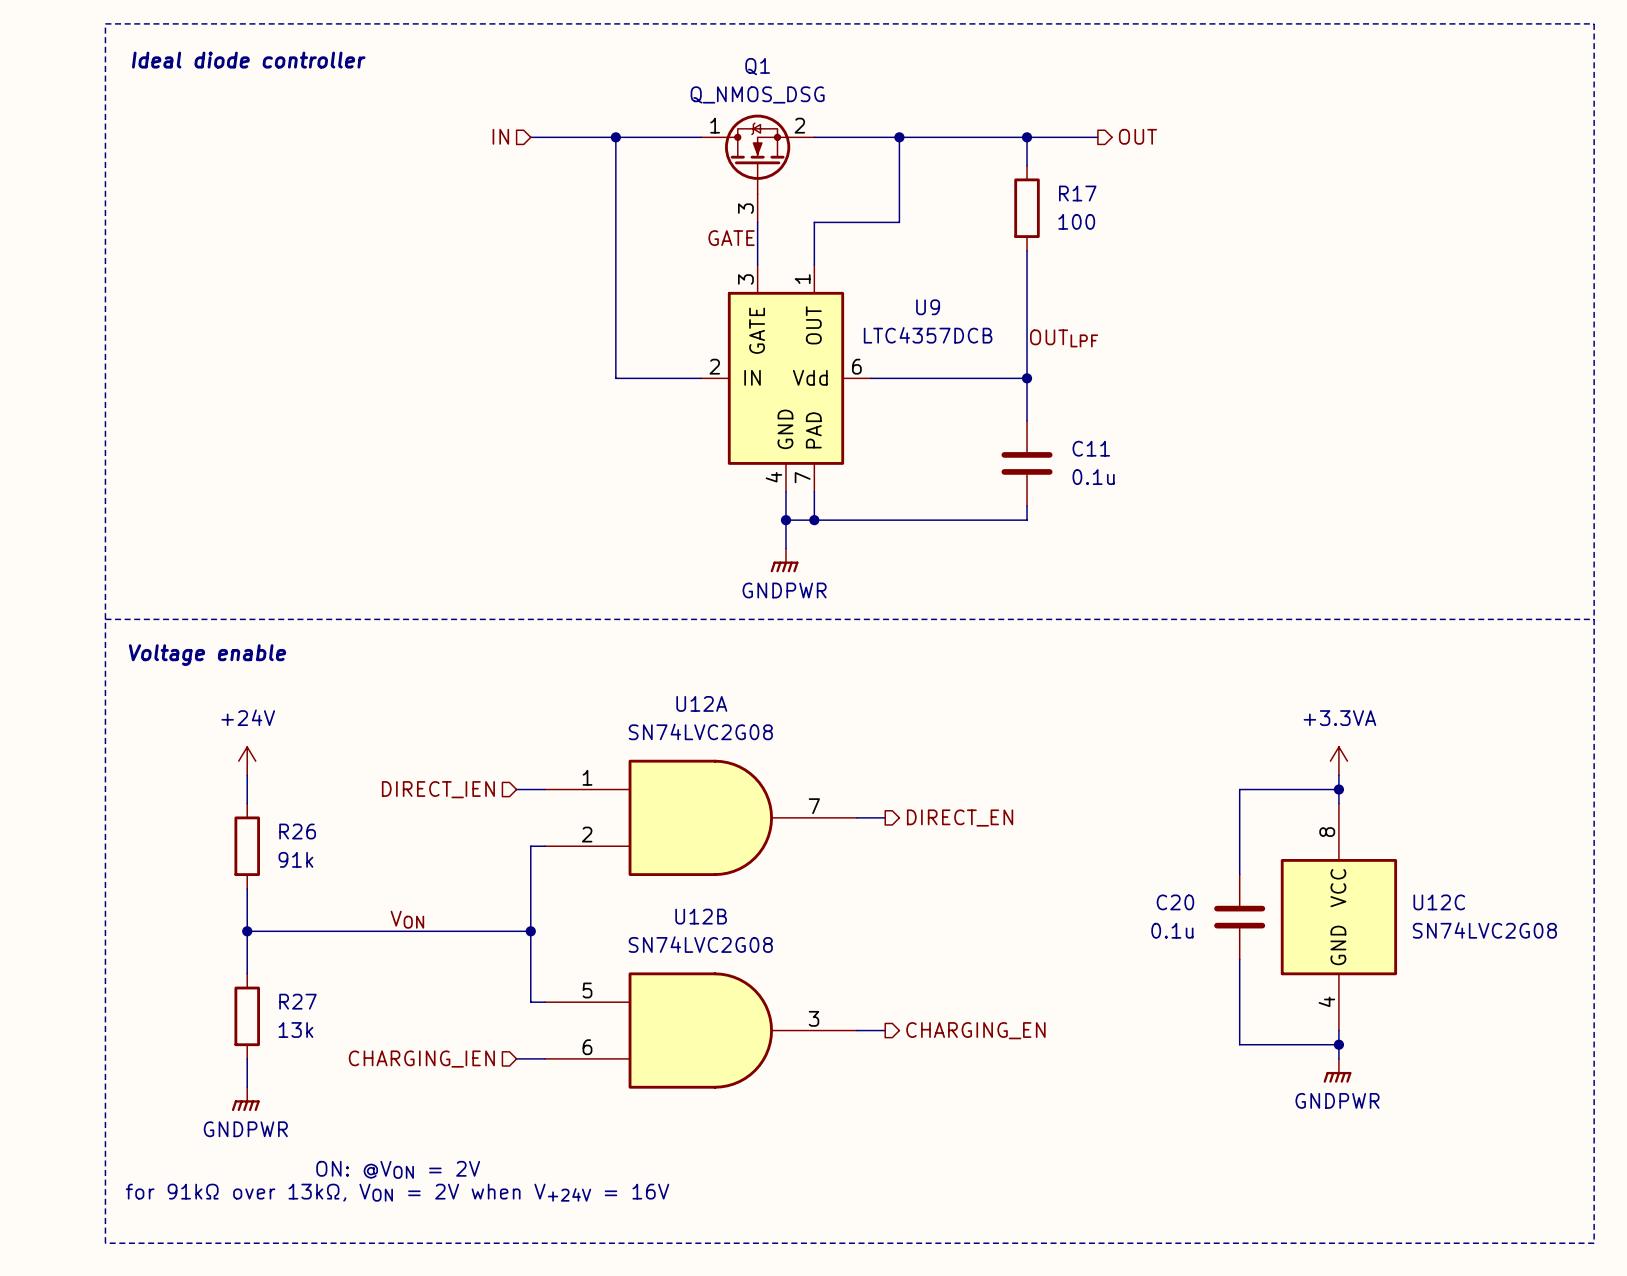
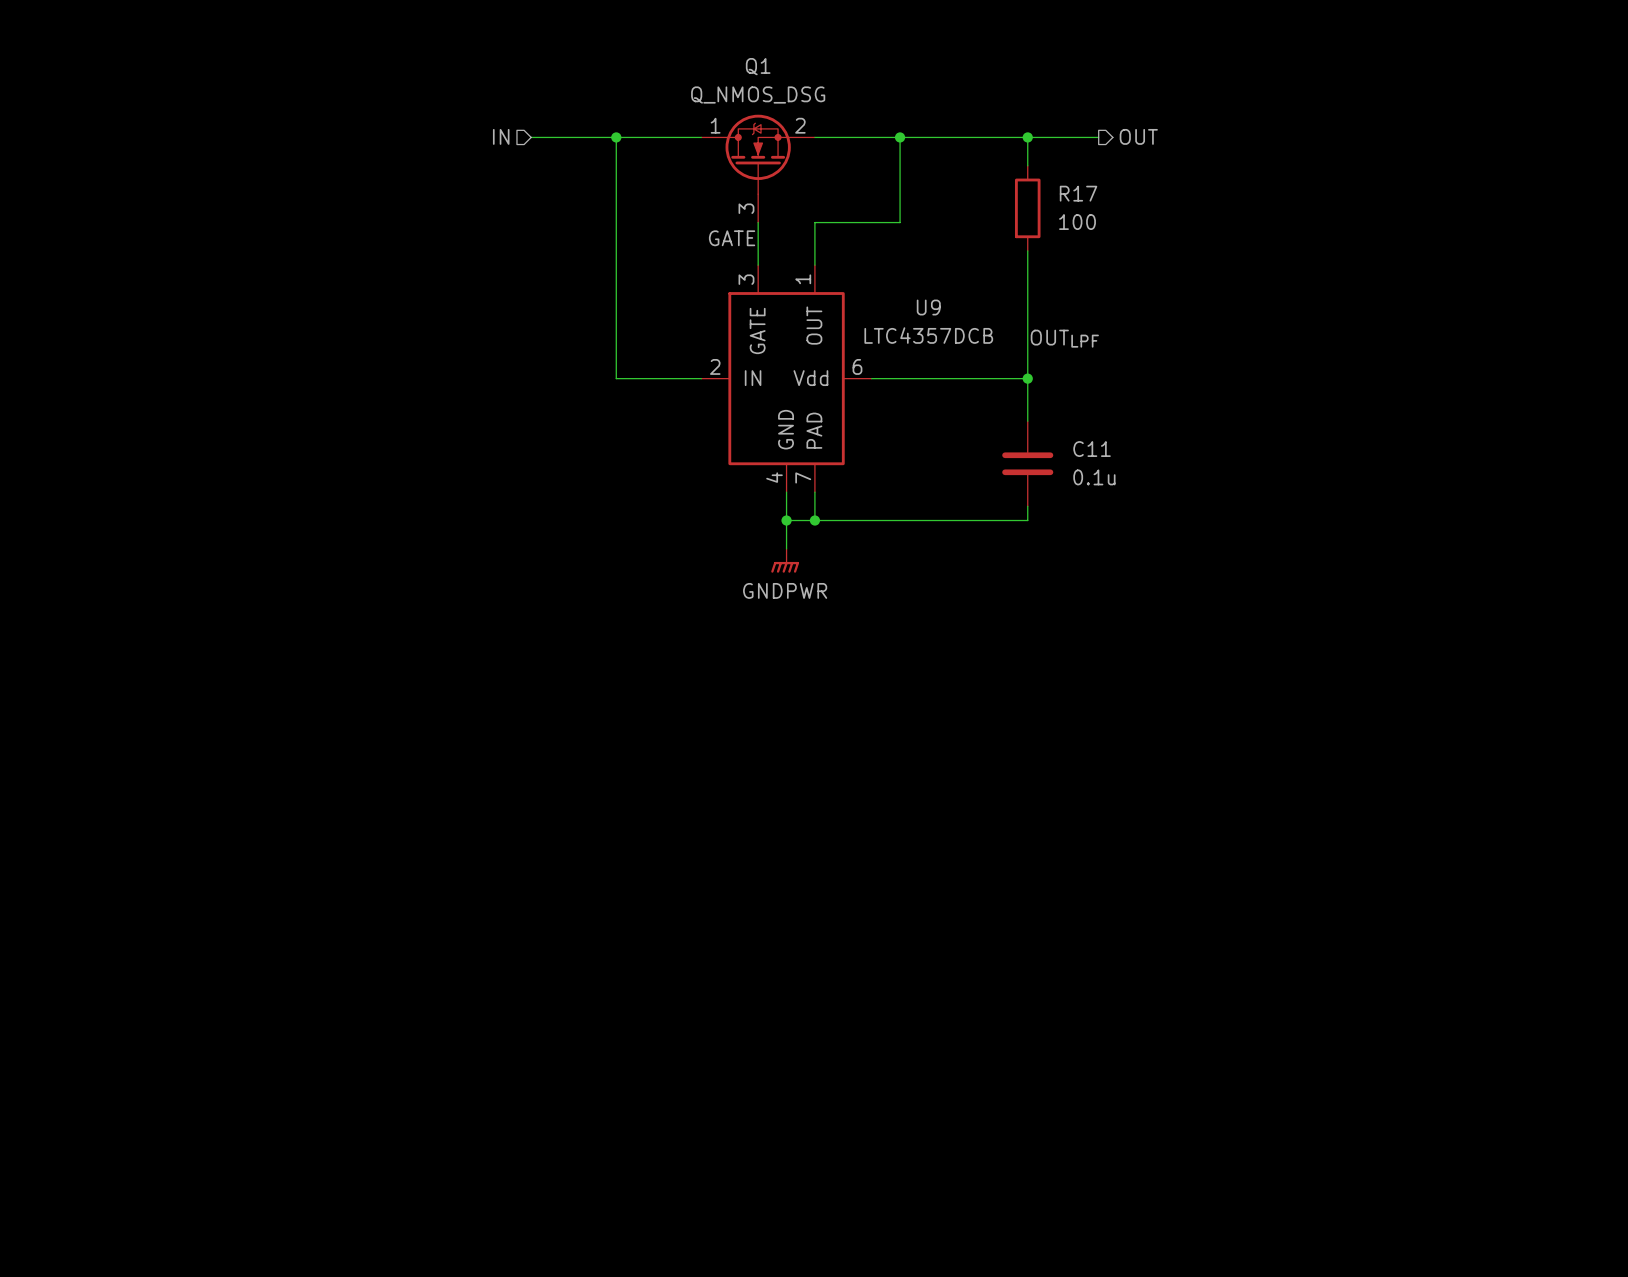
line: (105, 23) (1594, 23) (1594, 1243) (105, 1243) (105, 23) -> none
text: Ideal diode controller (248, 60) -> none
line: (105, 619) (1594, 619) -> none
text: Voltage enable (207, 655) -> none
power symbol: +24V (247, 761) -> none
power symbol: +3.3VA (1338, 761) -> none
wire: (247, 775) (247, 803) -> none
wire: (1338, 775) (1338, 803) -> none
hierarchical label: DIRECT_IEN (438, 789) -> none
wire: (516, 789) (544, 789) -> none
wire: (1338, 789) (1239, 789) (1239, 874) -> none
junction: (1338, 789) -> none
U12A: SN74LVC2G08 (700, 817) -> none
wire: (856, 817) (885, 817) -> none
hierarchical label: DIRECT_EN (960, 818) -> none
R26: 91k (247, 846) -> none
wire: (544, 846) (530, 846) (530, 1002) (544, 1002) -> none
wire: (247, 888) (247, 973) -> none
C20: 0.1u (1239, 917) -> none
U12C: SN74LVC2G08 (1338, 917) -> none
label: VON (407, 919) -> none
wire: (247, 931) (530, 931) -> none
junction: (247, 931) -> none
junction: (530, 931) -> none
wire: (1239, 959) (1239, 1044) (1338, 1044) -> none
R27: 13k (247, 1016) -> none
U12B: SN74LVC2G08 (700, 1030) -> none
wire: (856, 1030) (885, 1030) -> none
hierarchical label: CHARGING_EN (975, 1030) -> none
wire: (1338, 1030) (1338, 1058) -> none
junction: (1338, 1044) -> none
wire: (247, 1058) (247, 1087) -> none
wire: (516, 1058) (544, 1058) -> none
hierarchical label: CHARGING_IEN (421, 1059) -> none
power symbol: GNDPWR (1337, 1070) -> none
power symbol: GNDPWR (245, 1099) -> none
text: ON: @VON = 2V (398, 1169) -> none
text: for 91kΩ over 13kΩ, VON = 2V when V+24V = 16V (397, 1192) -> none

